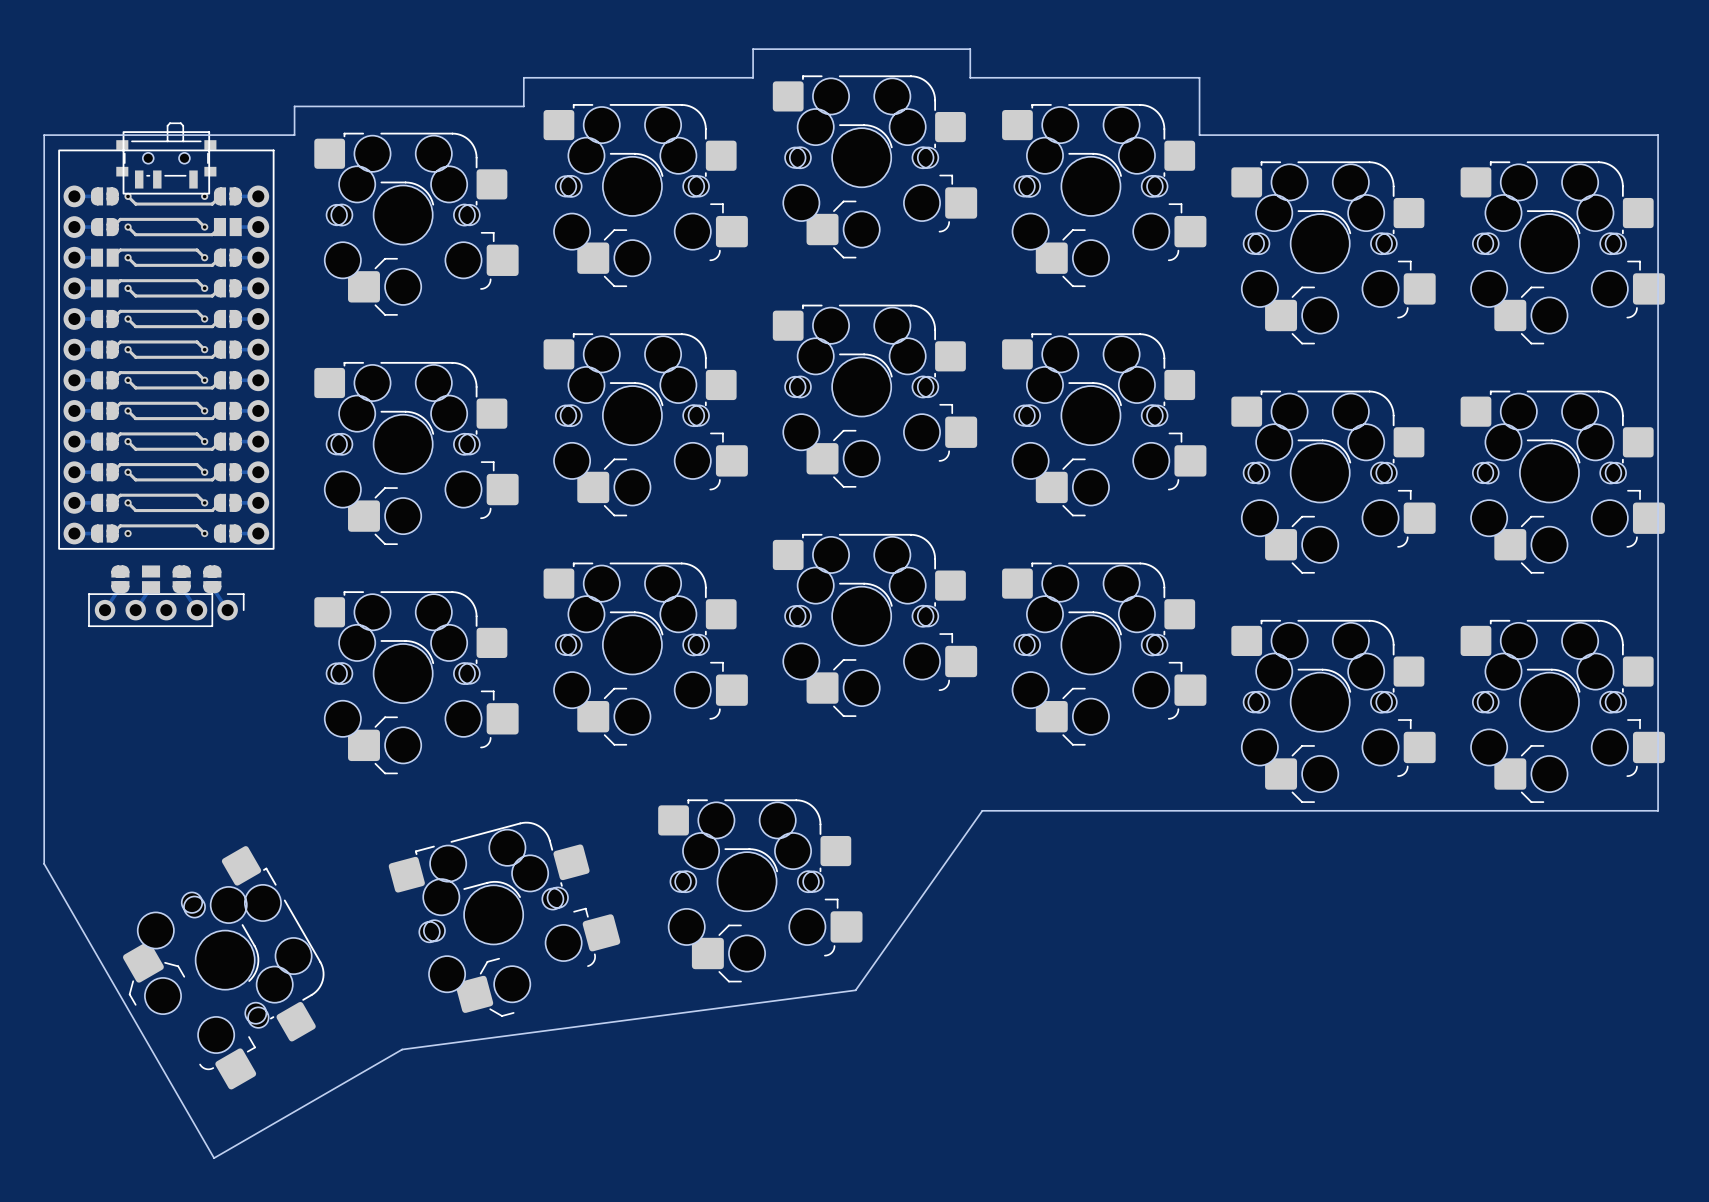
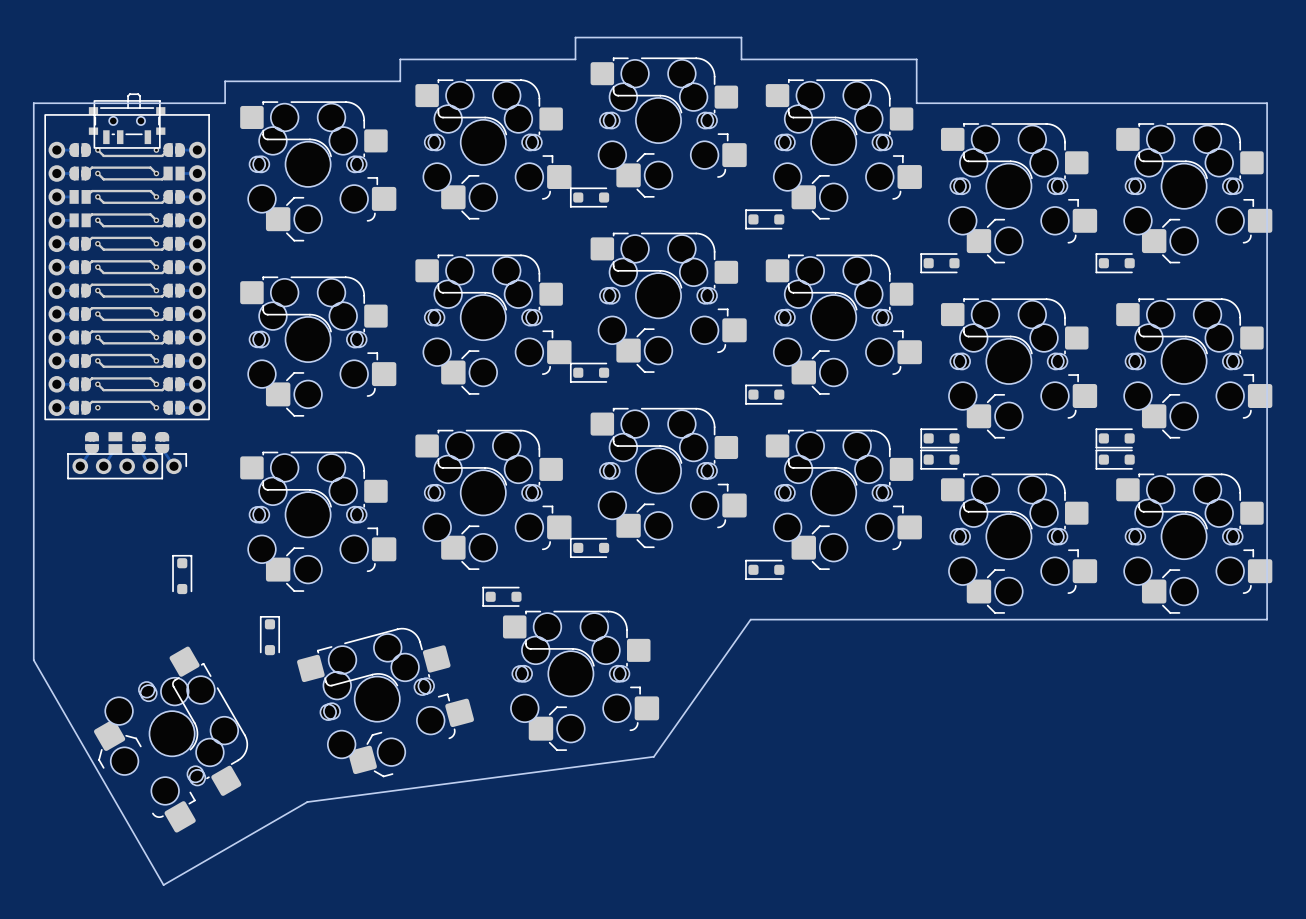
part footprint: [772, 75, 978, 259] -> [590, 57, 747, 198]
part footprint: [543, 104, 748, 287] -> [415, 79, 572, 220]
part footprint: [1002, 104, 1207, 287] -> [765, 79, 922, 220]
part footprint: [314, 132, 519, 316] -> [240, 101, 397, 242]
part footprint: [1231, 161, 1436, 345] -> [940, 123, 1098, 264]
part footprint: [1460, 161, 1665, 345] -> [1116, 123, 1273, 264]
part: none -> (589, 197)
part: none -> (764, 219)
part footprint: [772, 304, 978, 488] -> [590, 232, 747, 373]
part footprint: [543, 333, 748, 517] -> [415, 254, 572, 395]
part footprint: [1002, 333, 1207, 517] -> [765, 254, 922, 395]
part: none -> (940, 263)
part: none -> (1115, 263)
part footprint: [314, 361, 519, 545] -> [240, 276, 397, 417]
part footprint: [1231, 390, 1436, 574] -> [940, 298, 1098, 439]
part footprint: [1460, 390, 1665, 574] -> [1116, 298, 1273, 439]
part: none -> (589, 372)
part: none -> (764, 394)
part footprint: [772, 533, 978, 717] -> [590, 407, 747, 548]
part footprint: [543, 562, 748, 746] -> [415, 429, 572, 570]
part footprint: [1002, 562, 1207, 746] -> [765, 429, 922, 570]
part: none -> (940, 438)
part: none -> (1115, 438)
part footprint: [314, 591, 519, 775] -> [240, 451, 397, 592]
part: none -> (940, 459)
part: none -> (1115, 459)
part footprint: [1231, 619, 1436, 803] -> [940, 473, 1098, 614]
part footprint: [1460, 619, 1665, 803] -> [1116, 473, 1273, 614]
part: none -> (589, 547)
part: none -> (764, 569)
part: none -> (182, 574)
part: none -> (502, 596)
part footprint: [658, 799, 863, 983] -> [502, 610, 660, 751]
part footprint: [388, 821, 621, 1017] -> [297, 627, 475, 777]
part: none -> (269, 635)
part footprint: [122, 846, 325, 1090] -> [93, 646, 248, 833]

